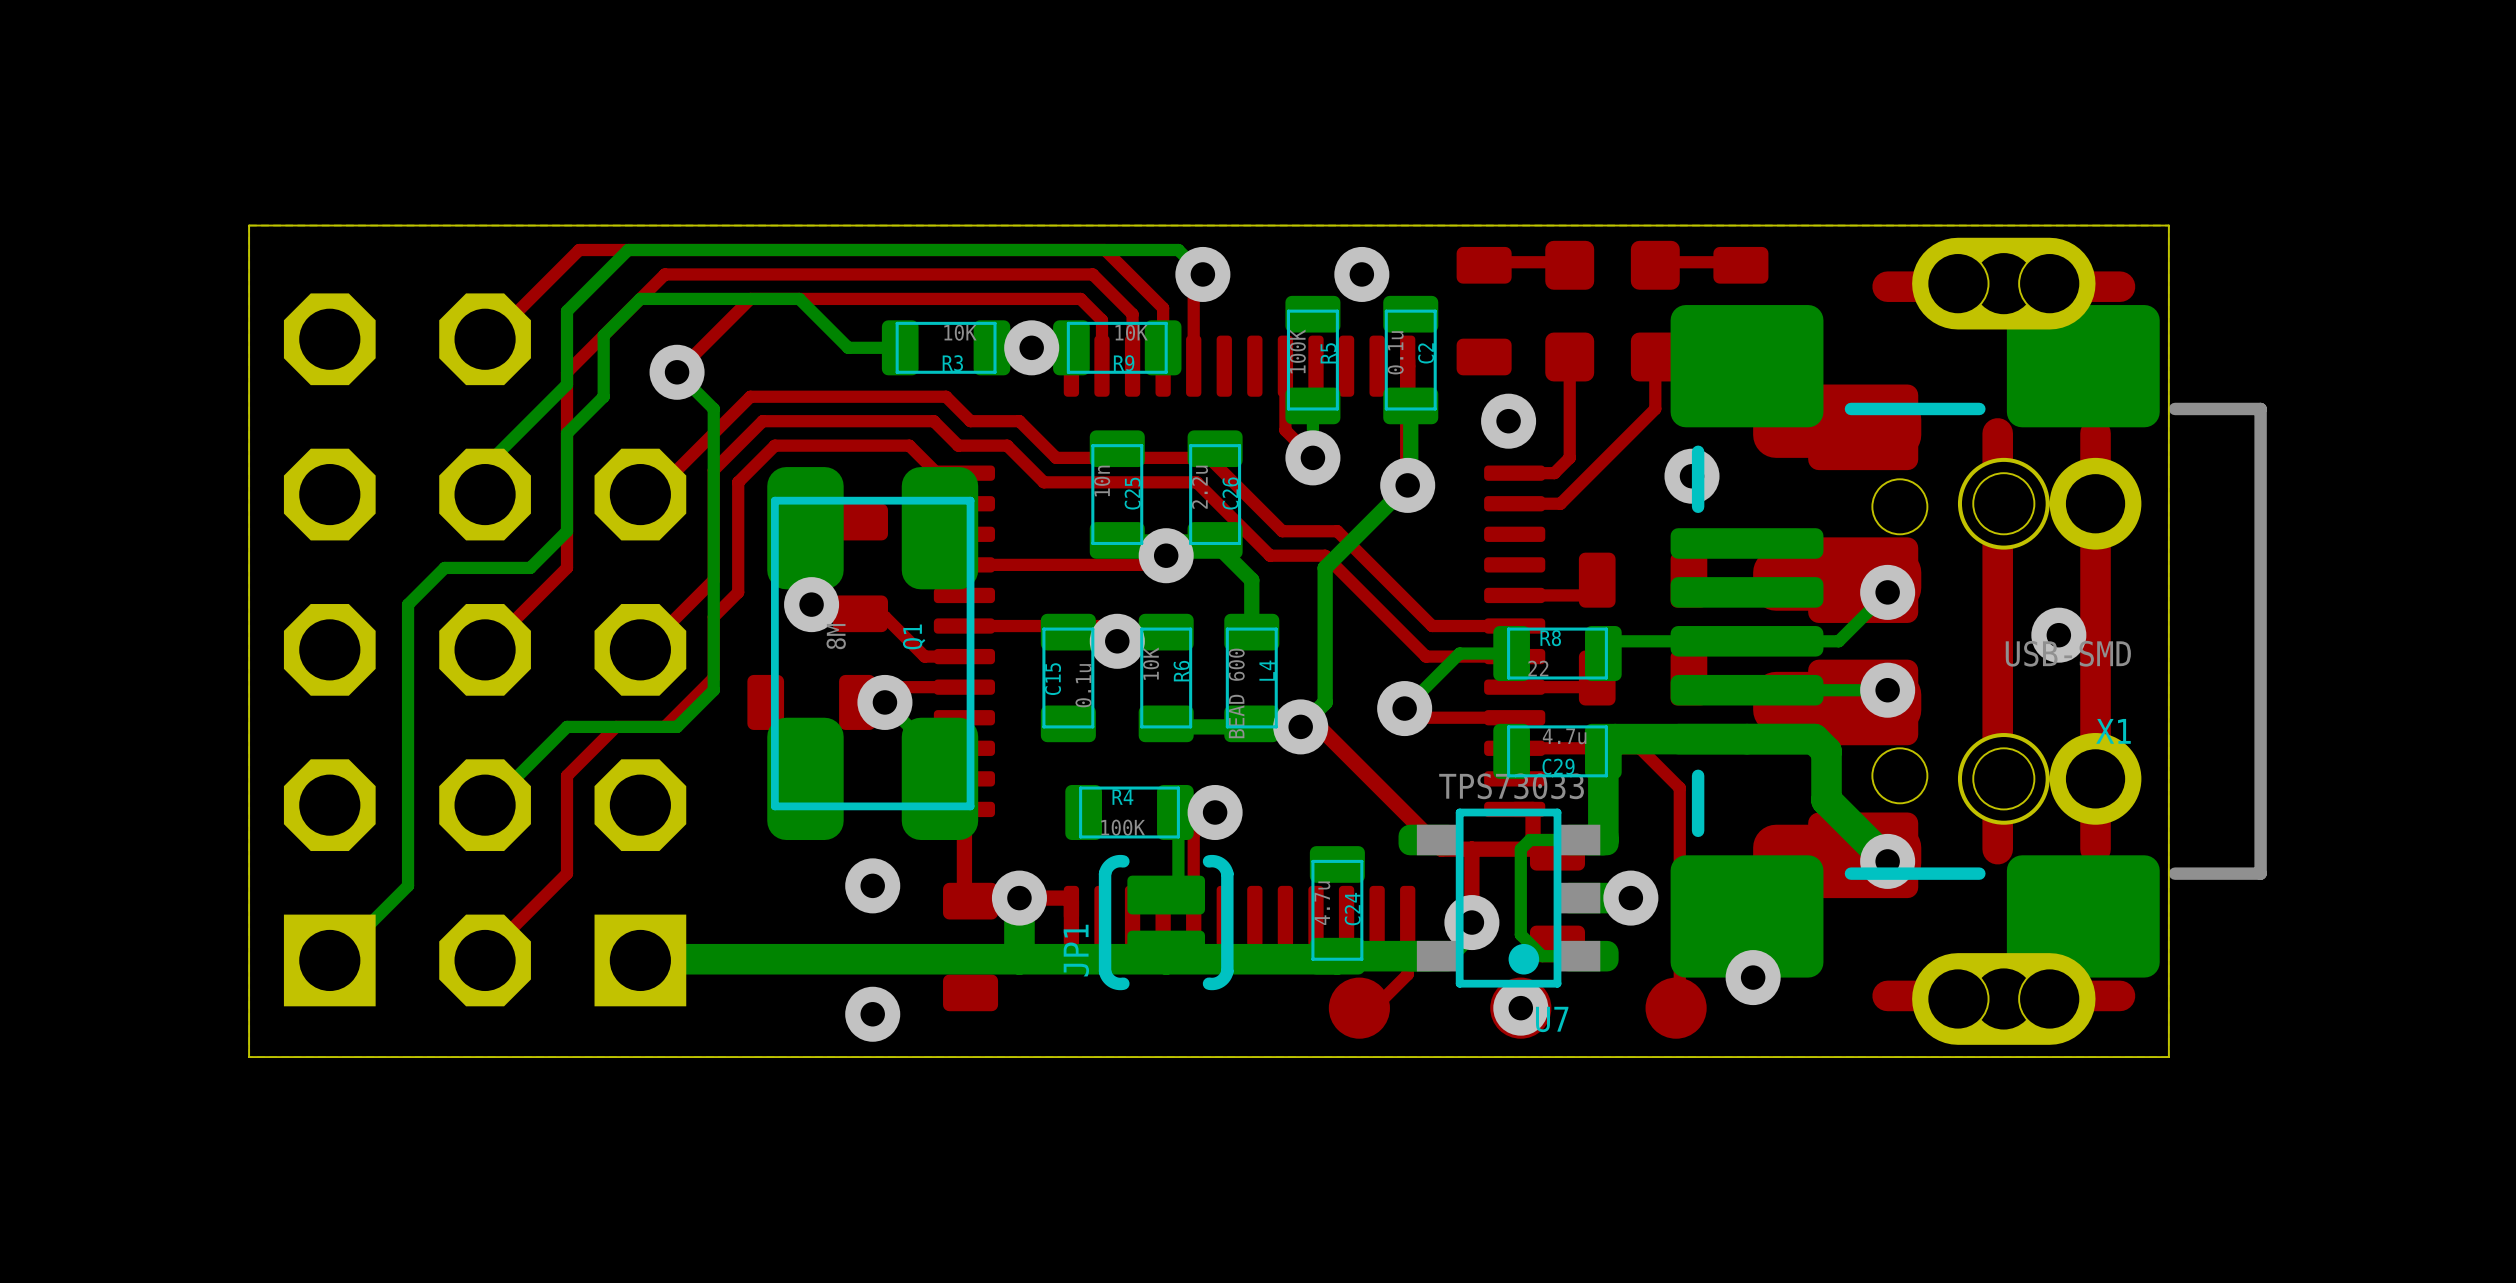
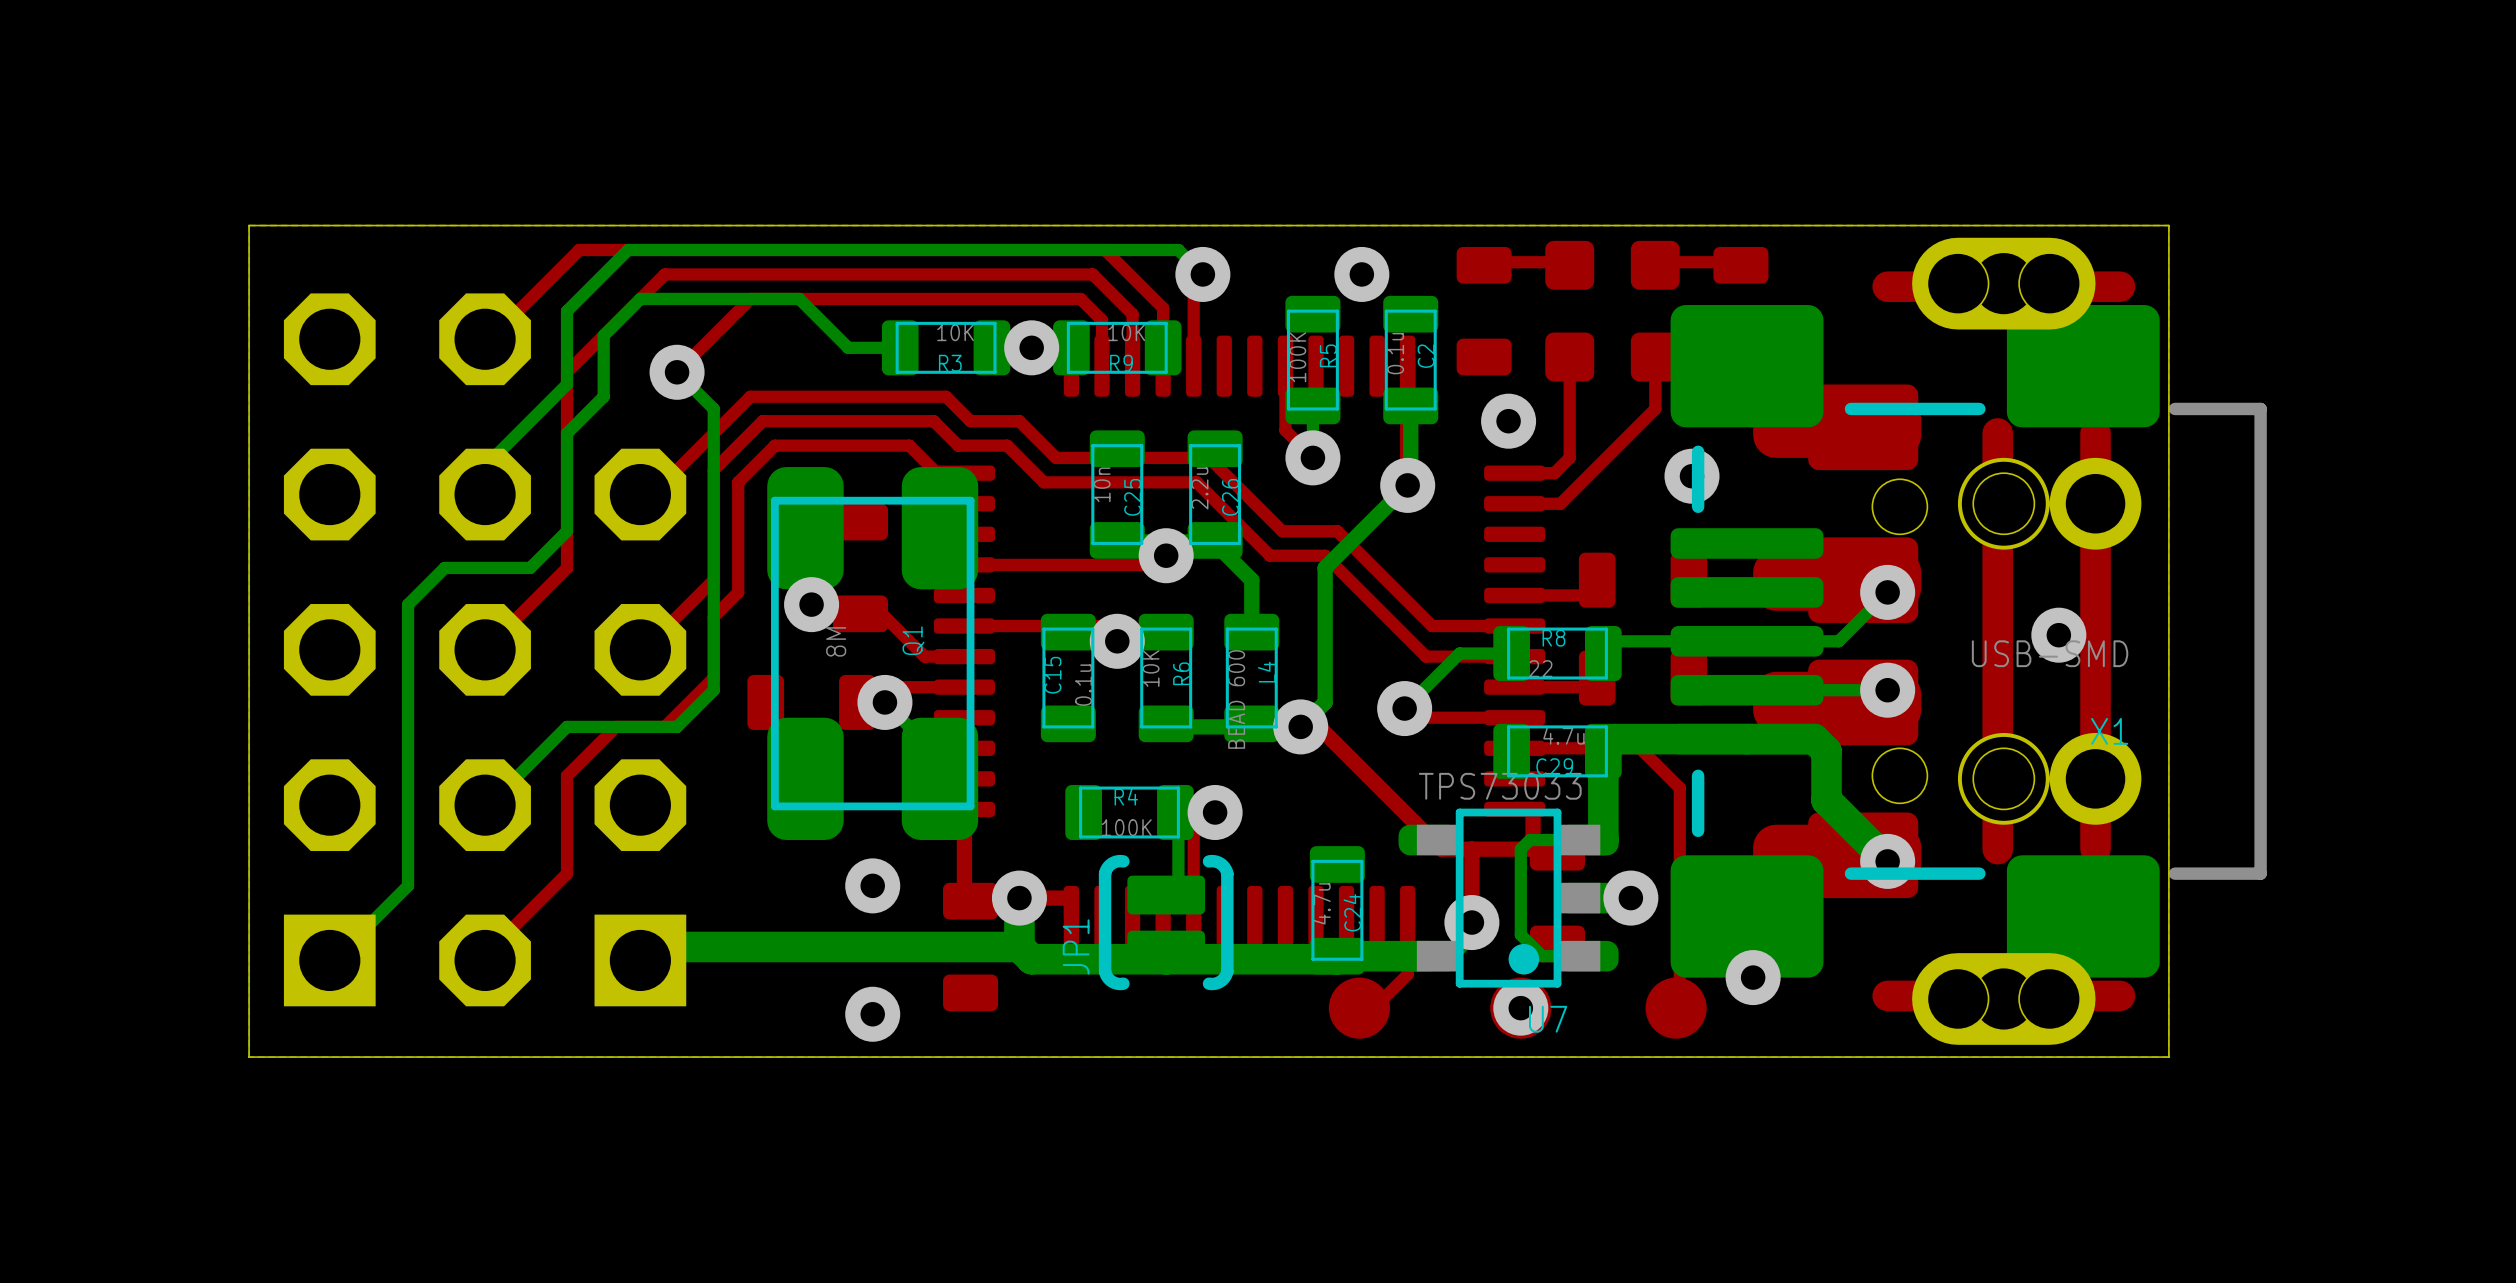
bottom track: (1031, 959) (640, 960) -> (1031, 959) (1019, 947) (641, 947) (640, 960)

